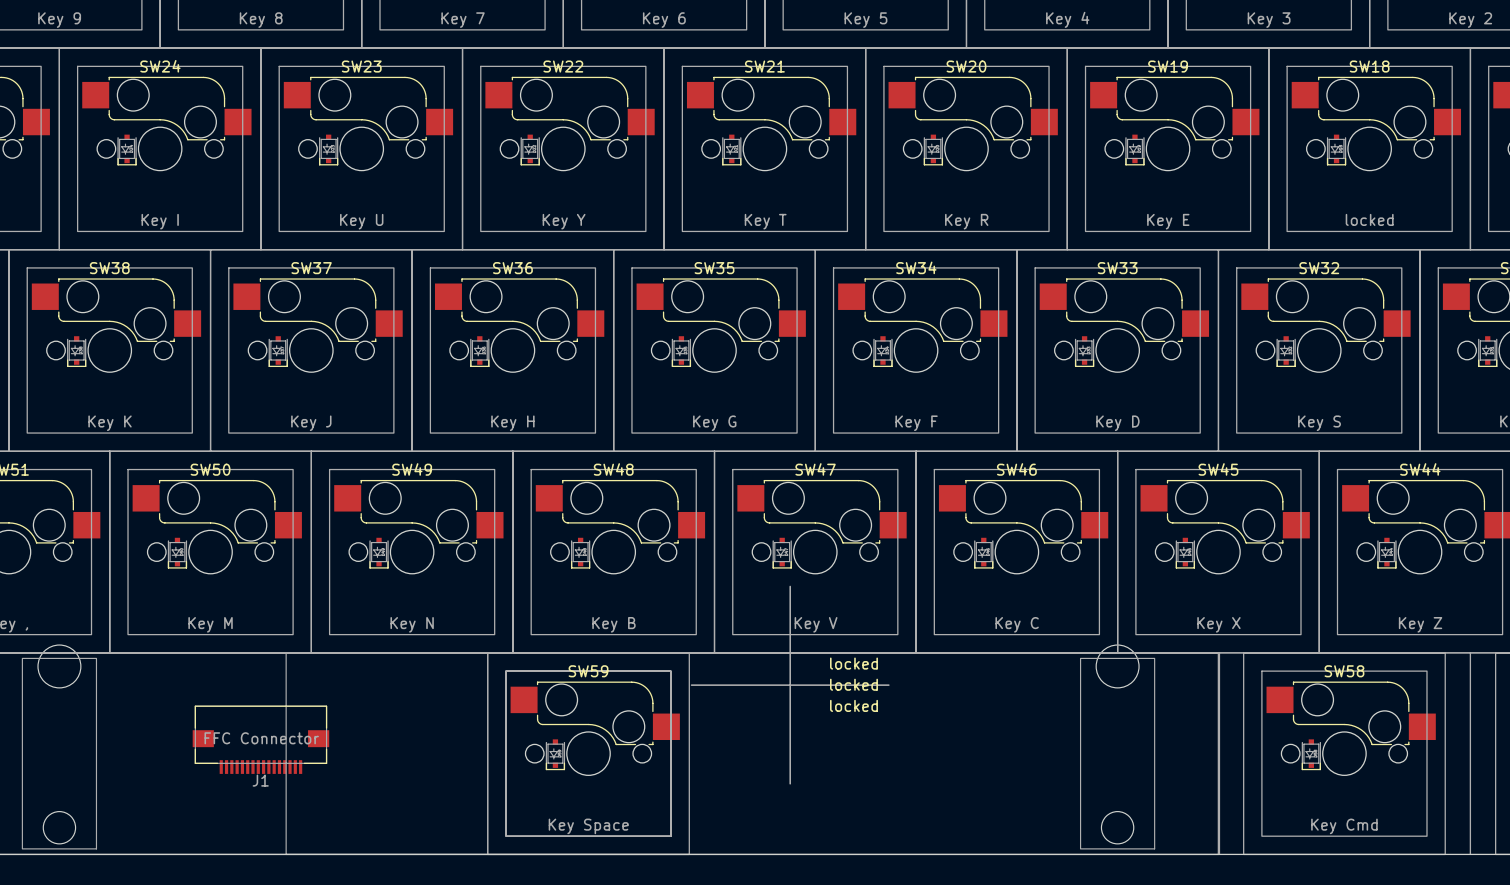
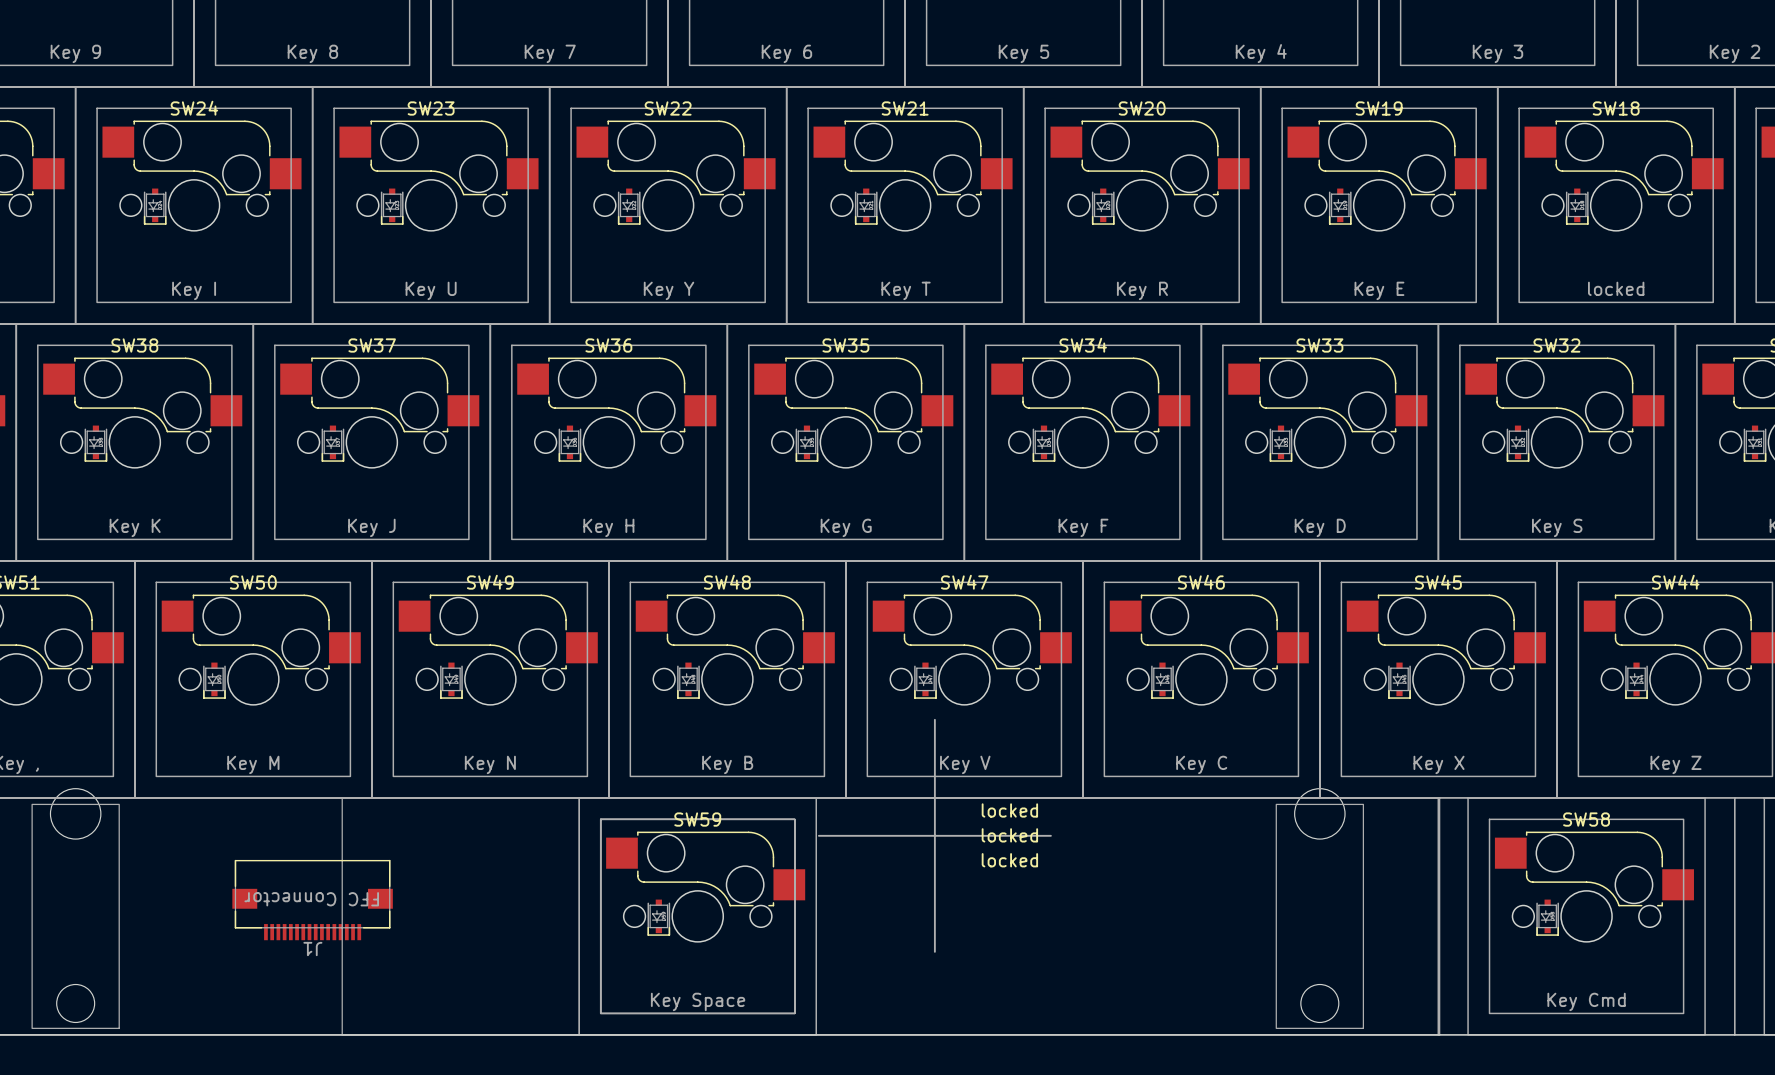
J1 value rotation: 0° (261, 738) -> 180° (311, 899)
J1 name rotation: 0° (260, 780) -> 180° (312, 949)

